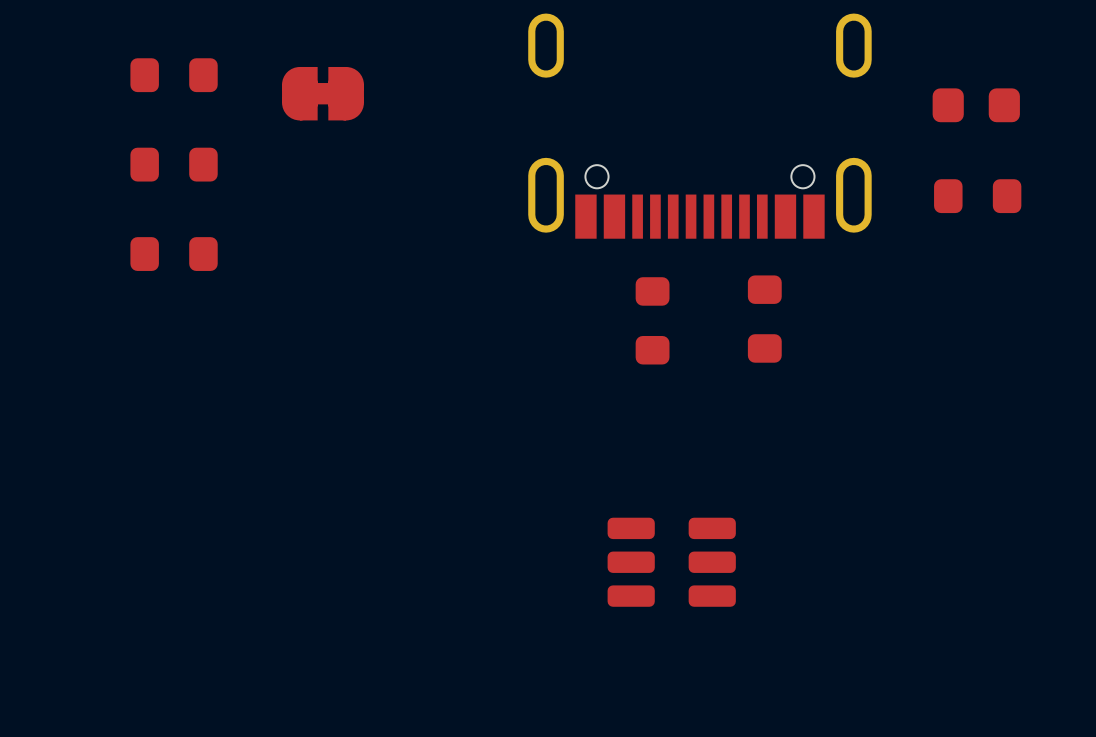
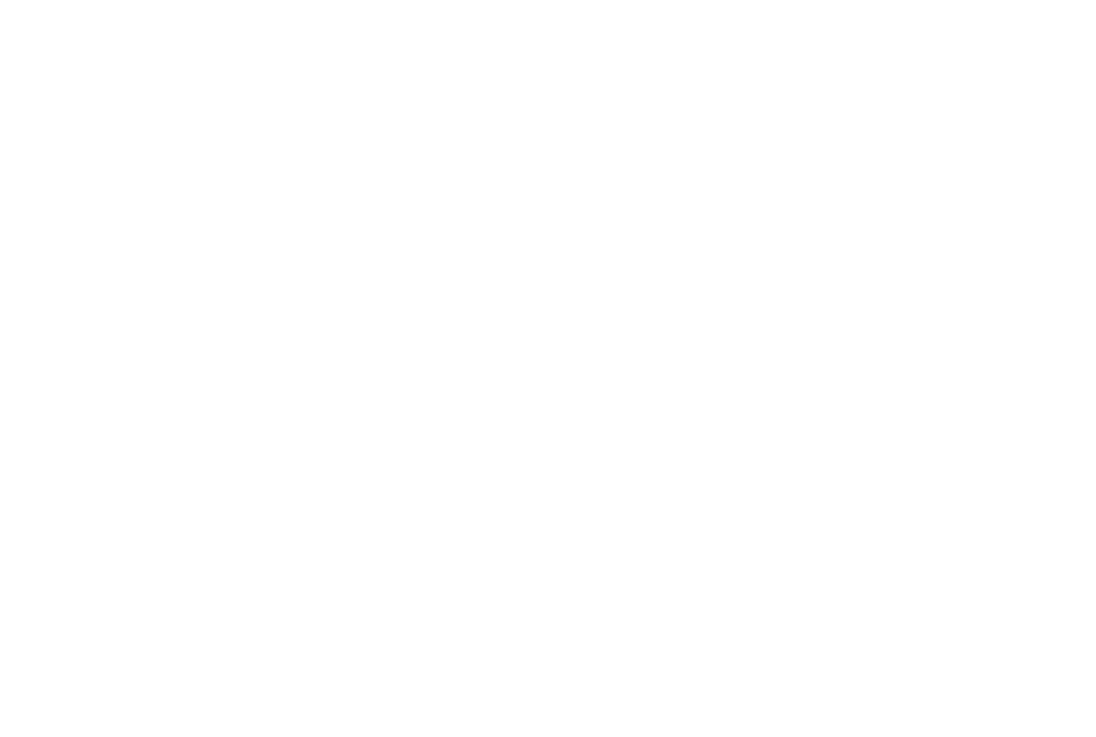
part: (174, 75) -> none
part: (322, 93) -> none
part: (976, 105) -> none
part: (699, 126) -> none
part: (174, 164) -> none
part: (977, 196) -> none
part: (174, 254) -> none
part: (764, 319) -> none
part: (652, 320) -> none
part: (671, 562) -> none

